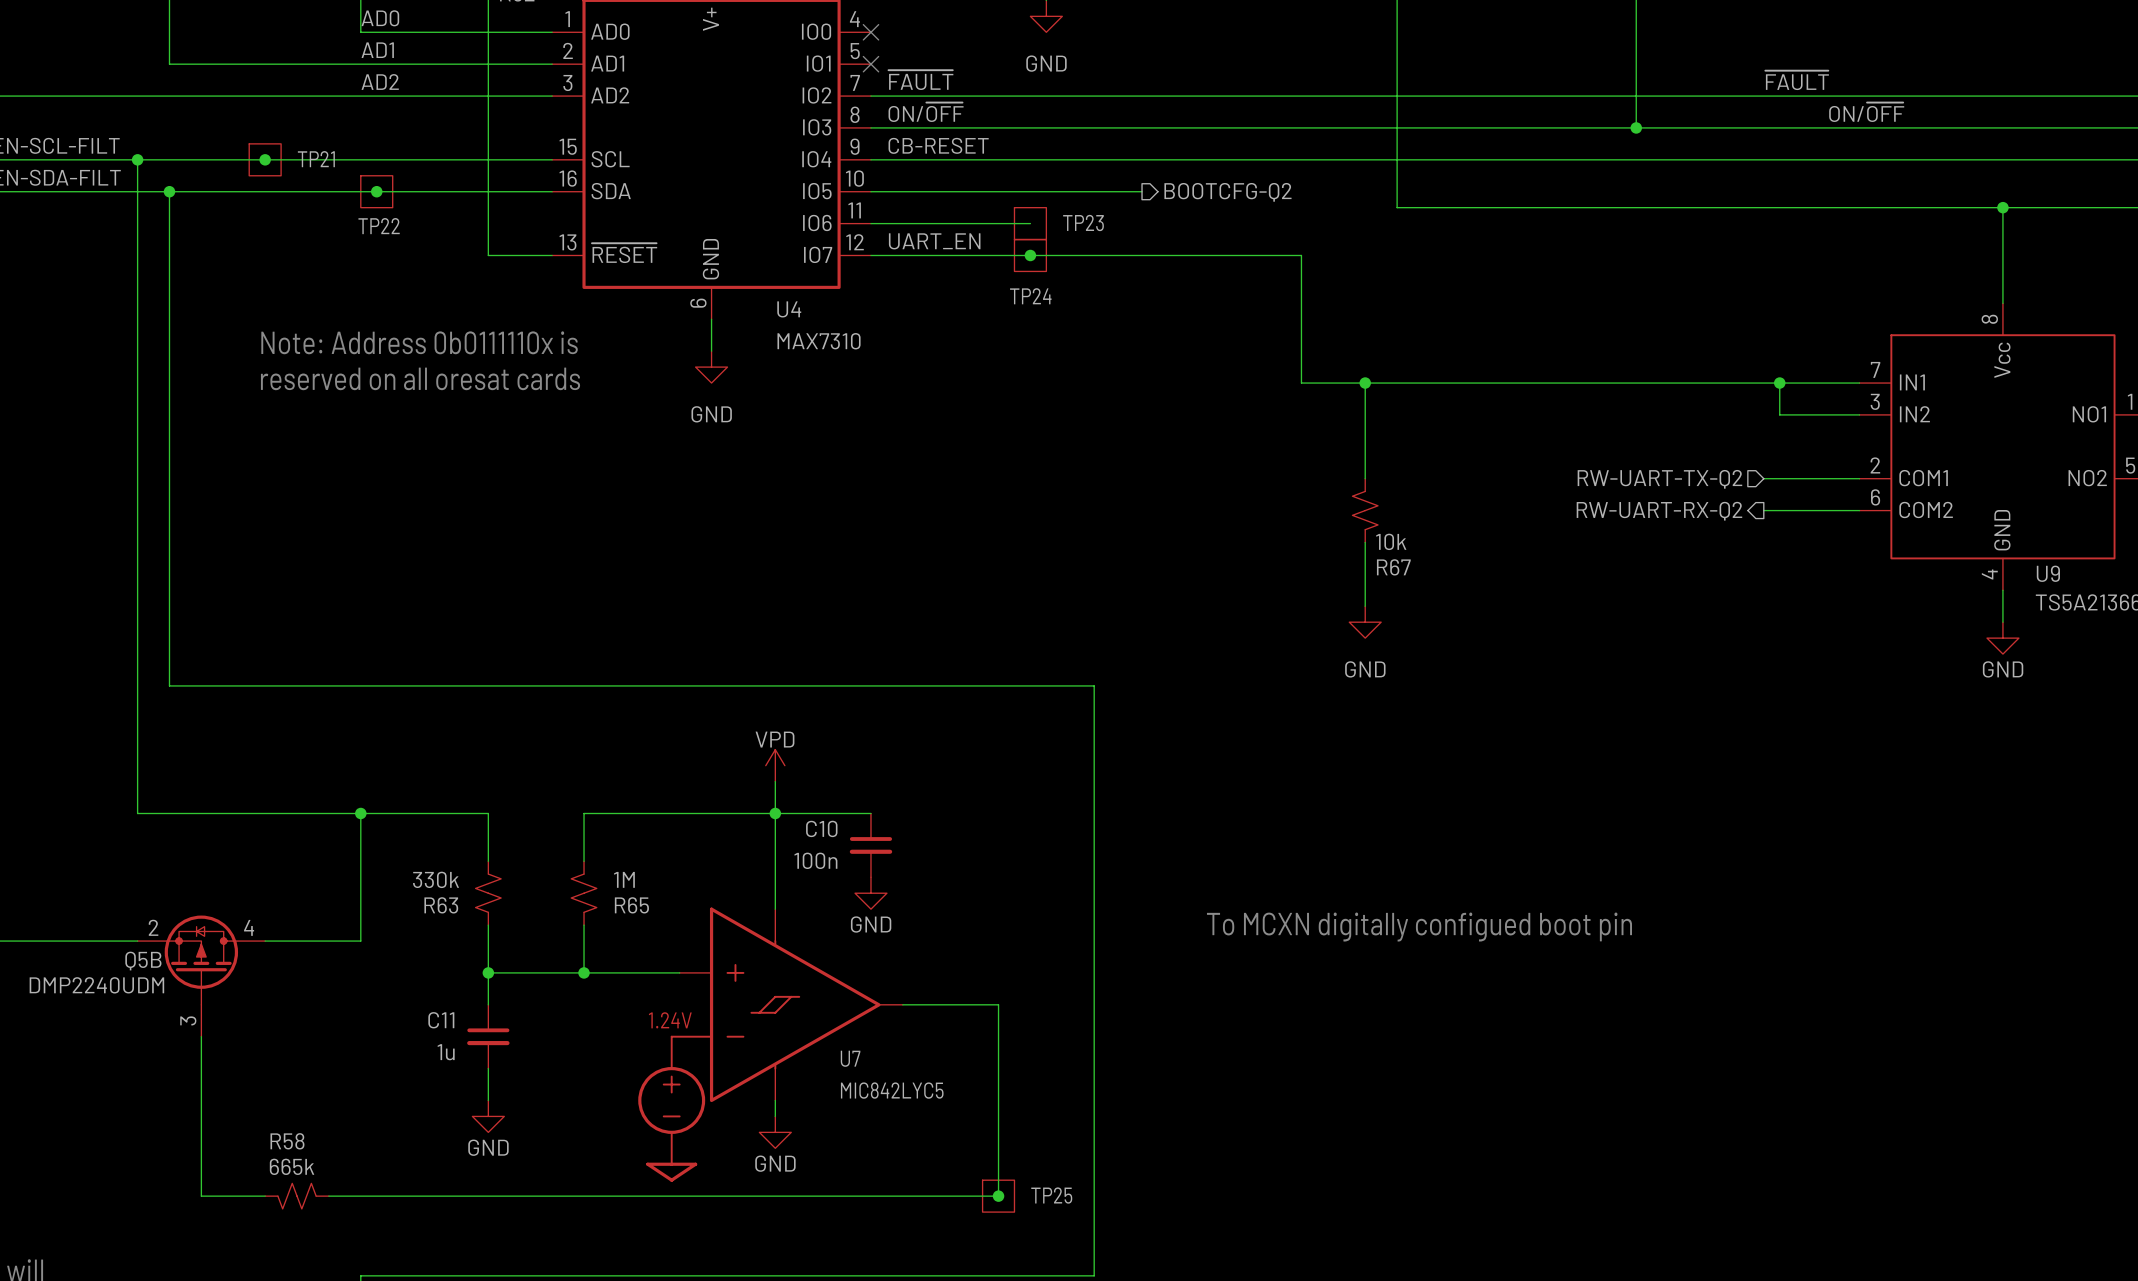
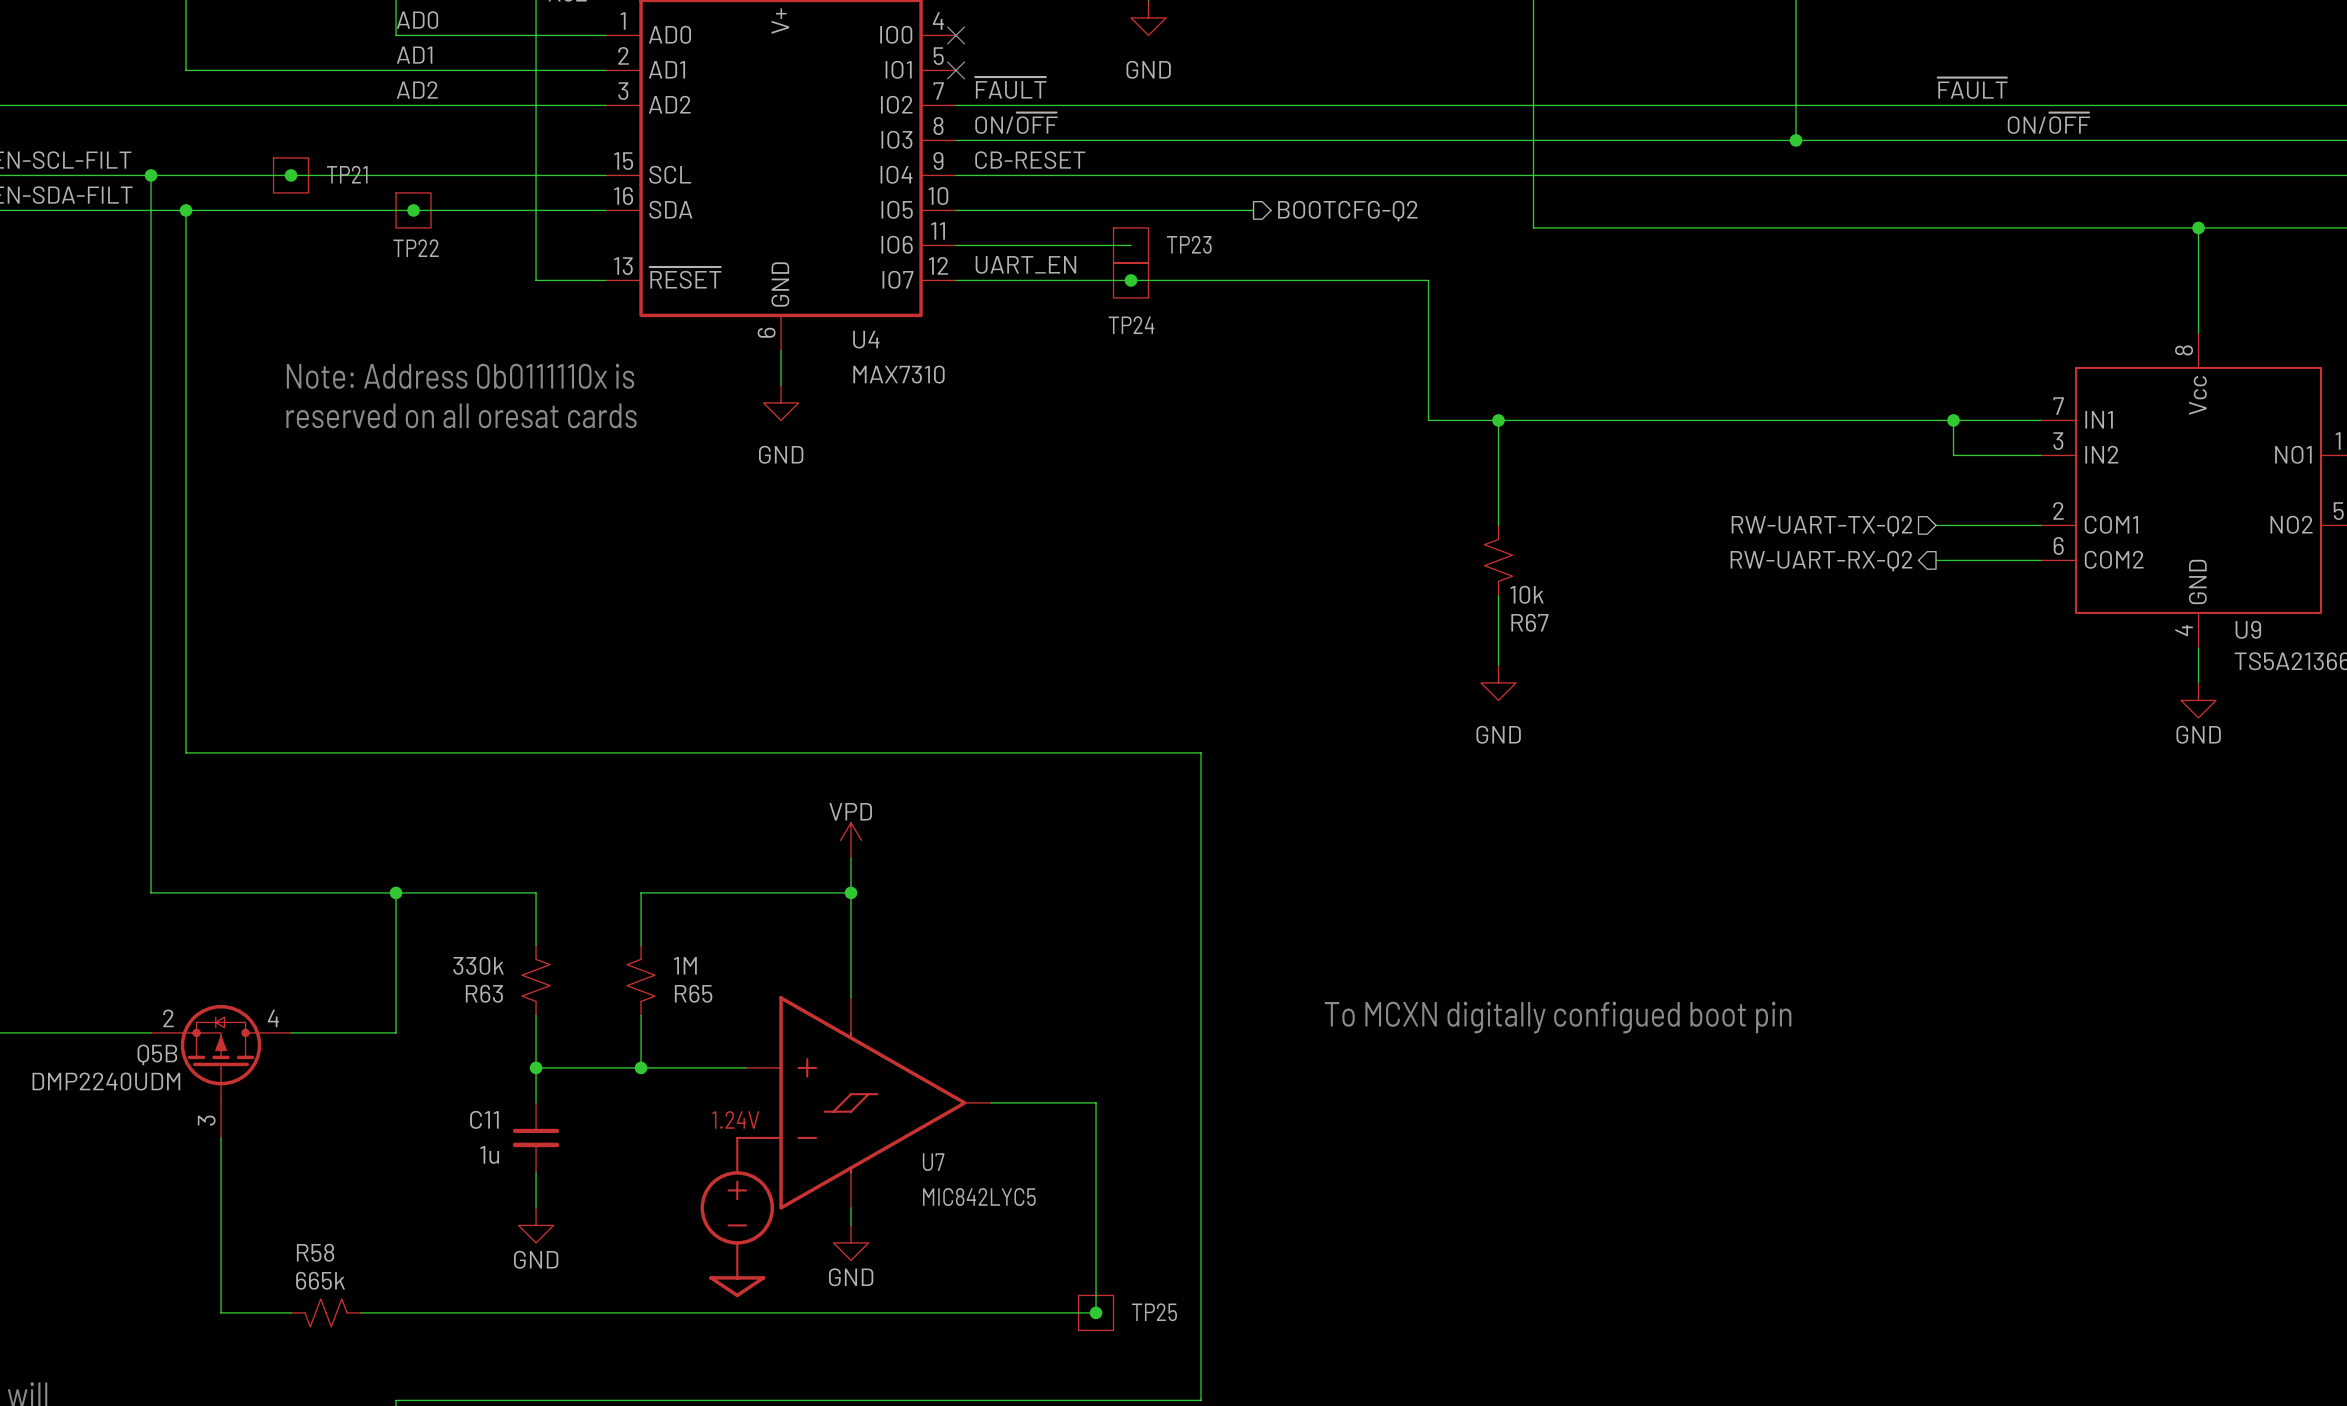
wire: (775, 813) (870, 813) -> none
C10: 100n (870, 845) -> none
power symbol: GND (870, 893) -> none

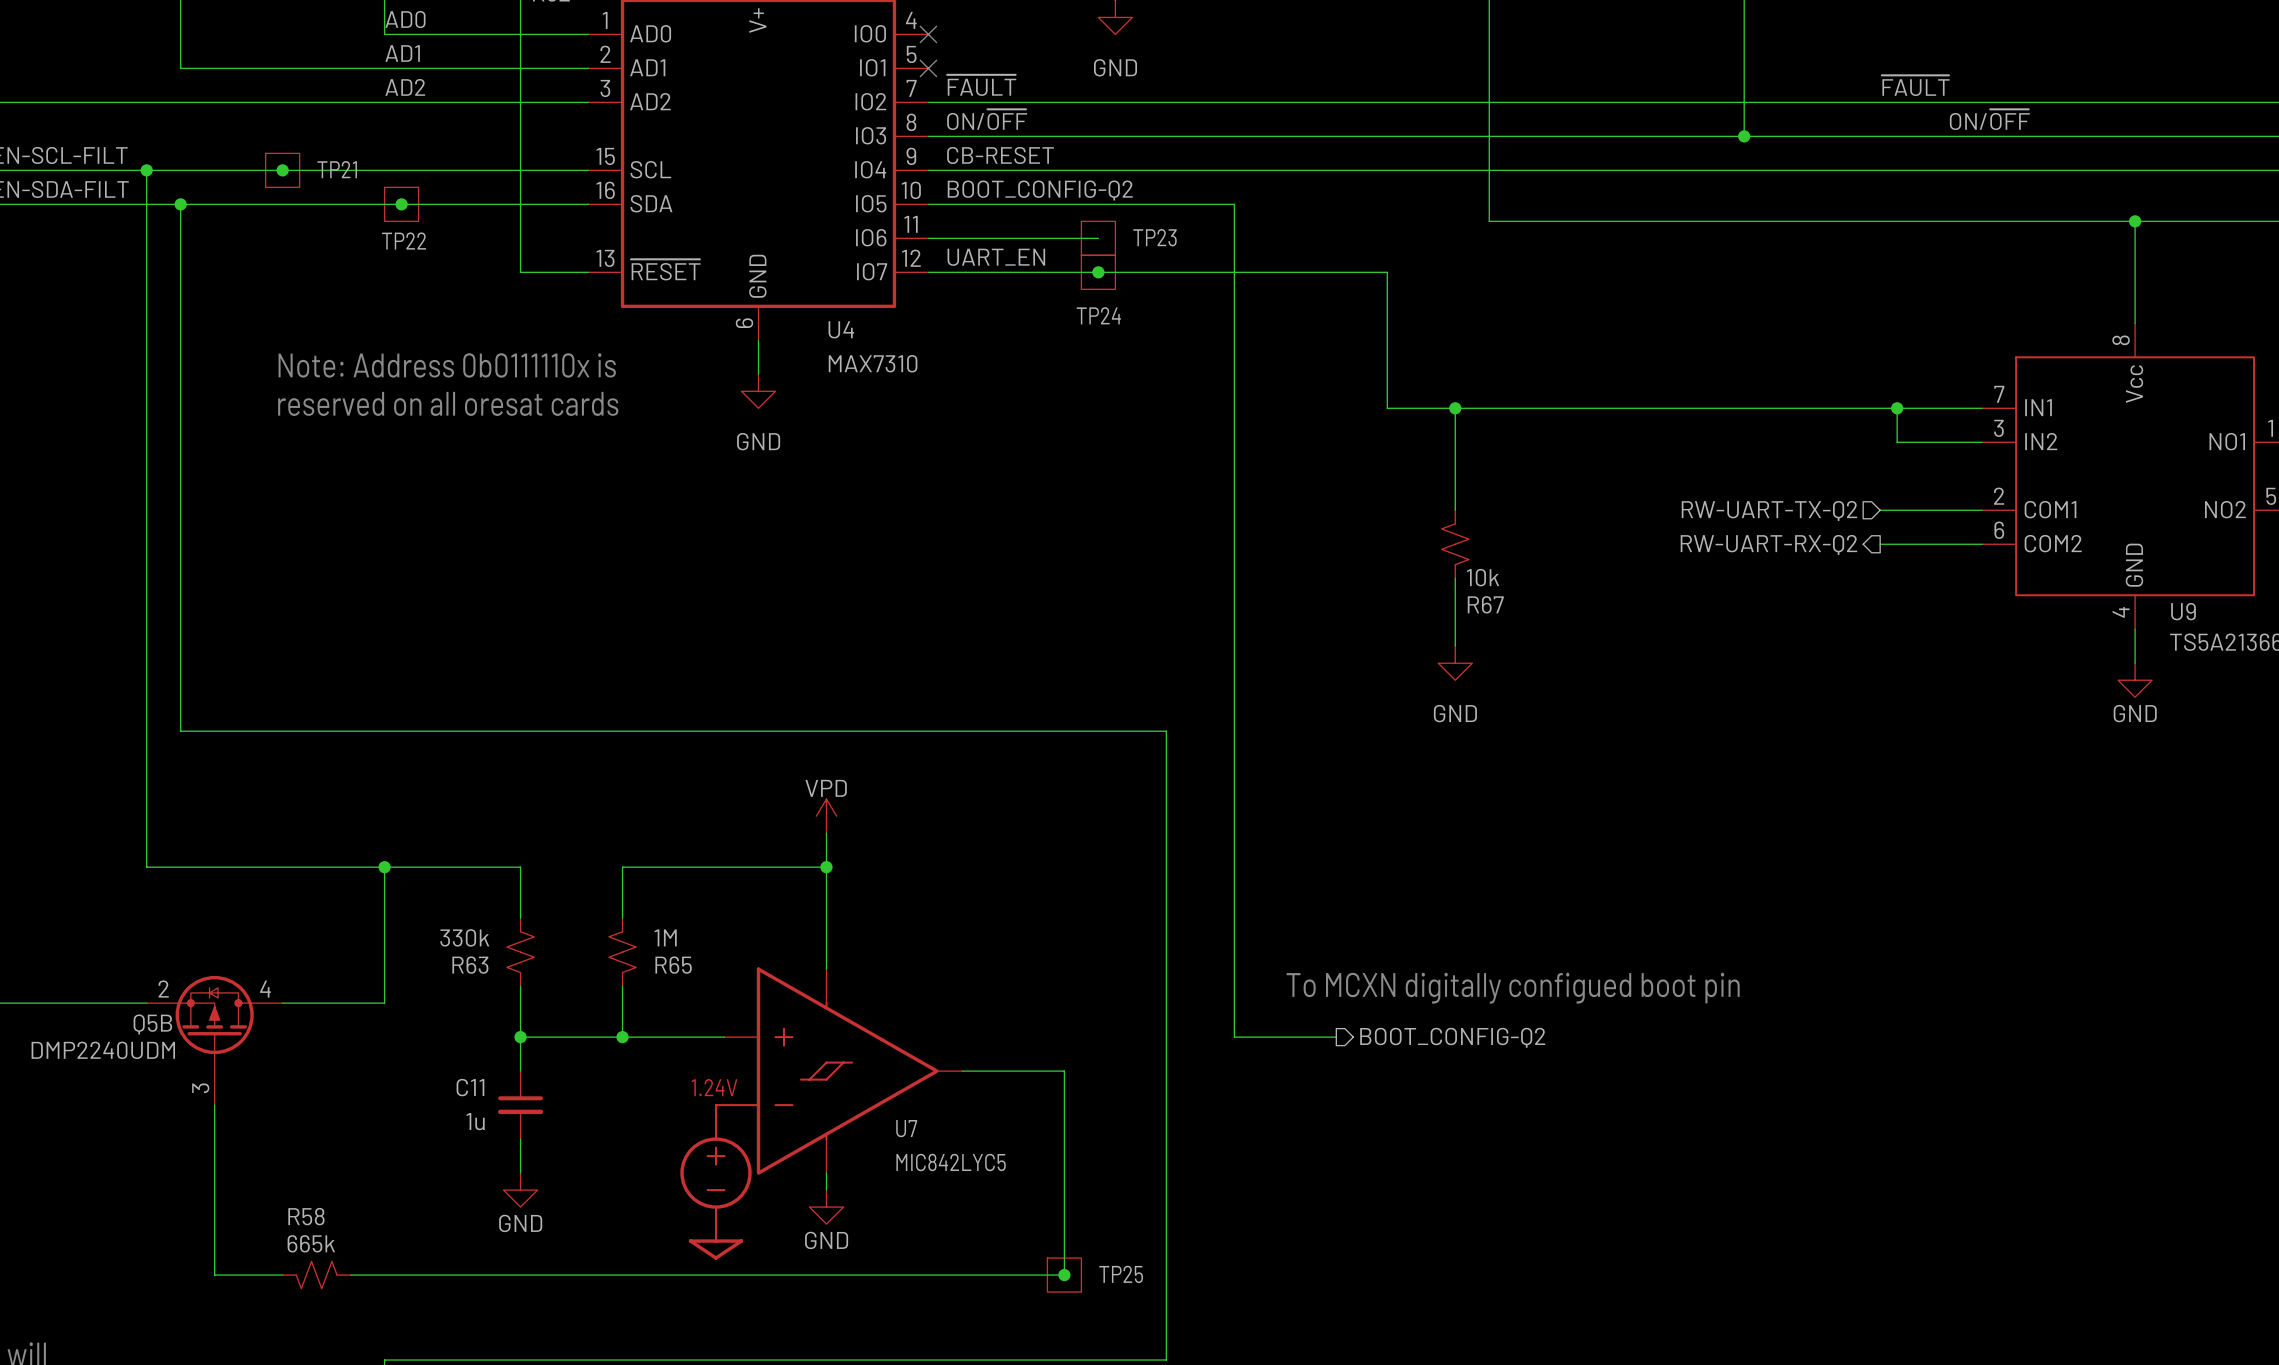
label: none -> BOOT_CONFIG-Q2 (1040, 190)
wire: none -> (1217, 204) (1234, 204) (1234, 1037) (1336, 1037)
hierarchical label: BOOTCFG-Q2 (1347, 211) -> none
hierarchical label: none -> BOOT_CONFIG-Q2 (1452, 1037)

